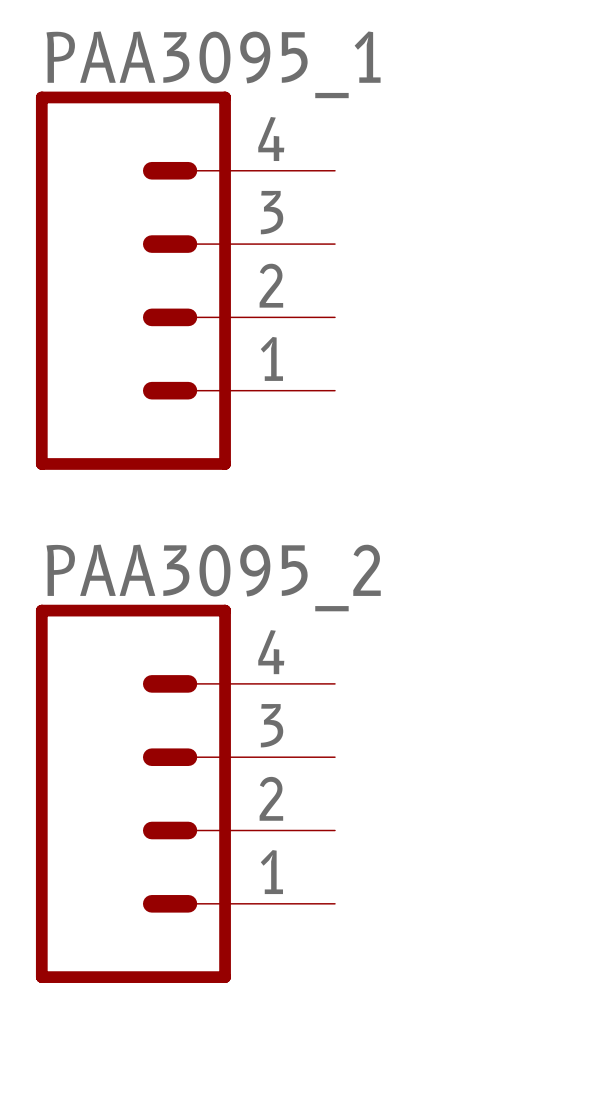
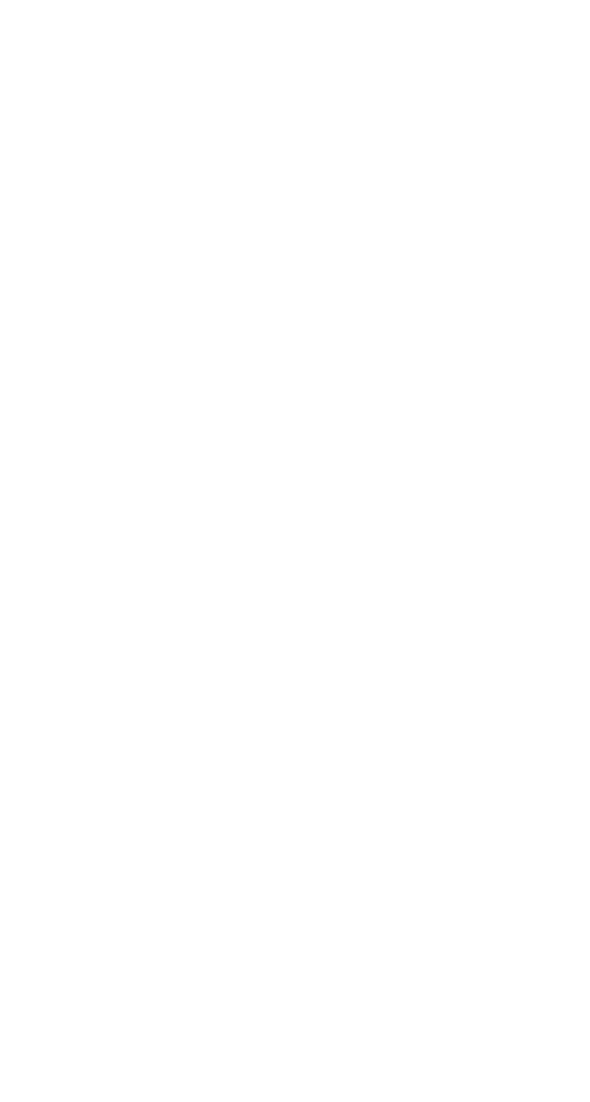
PAA3095_1: (185, 280) -> none
PAA3095_2: (185, 793) -> none

